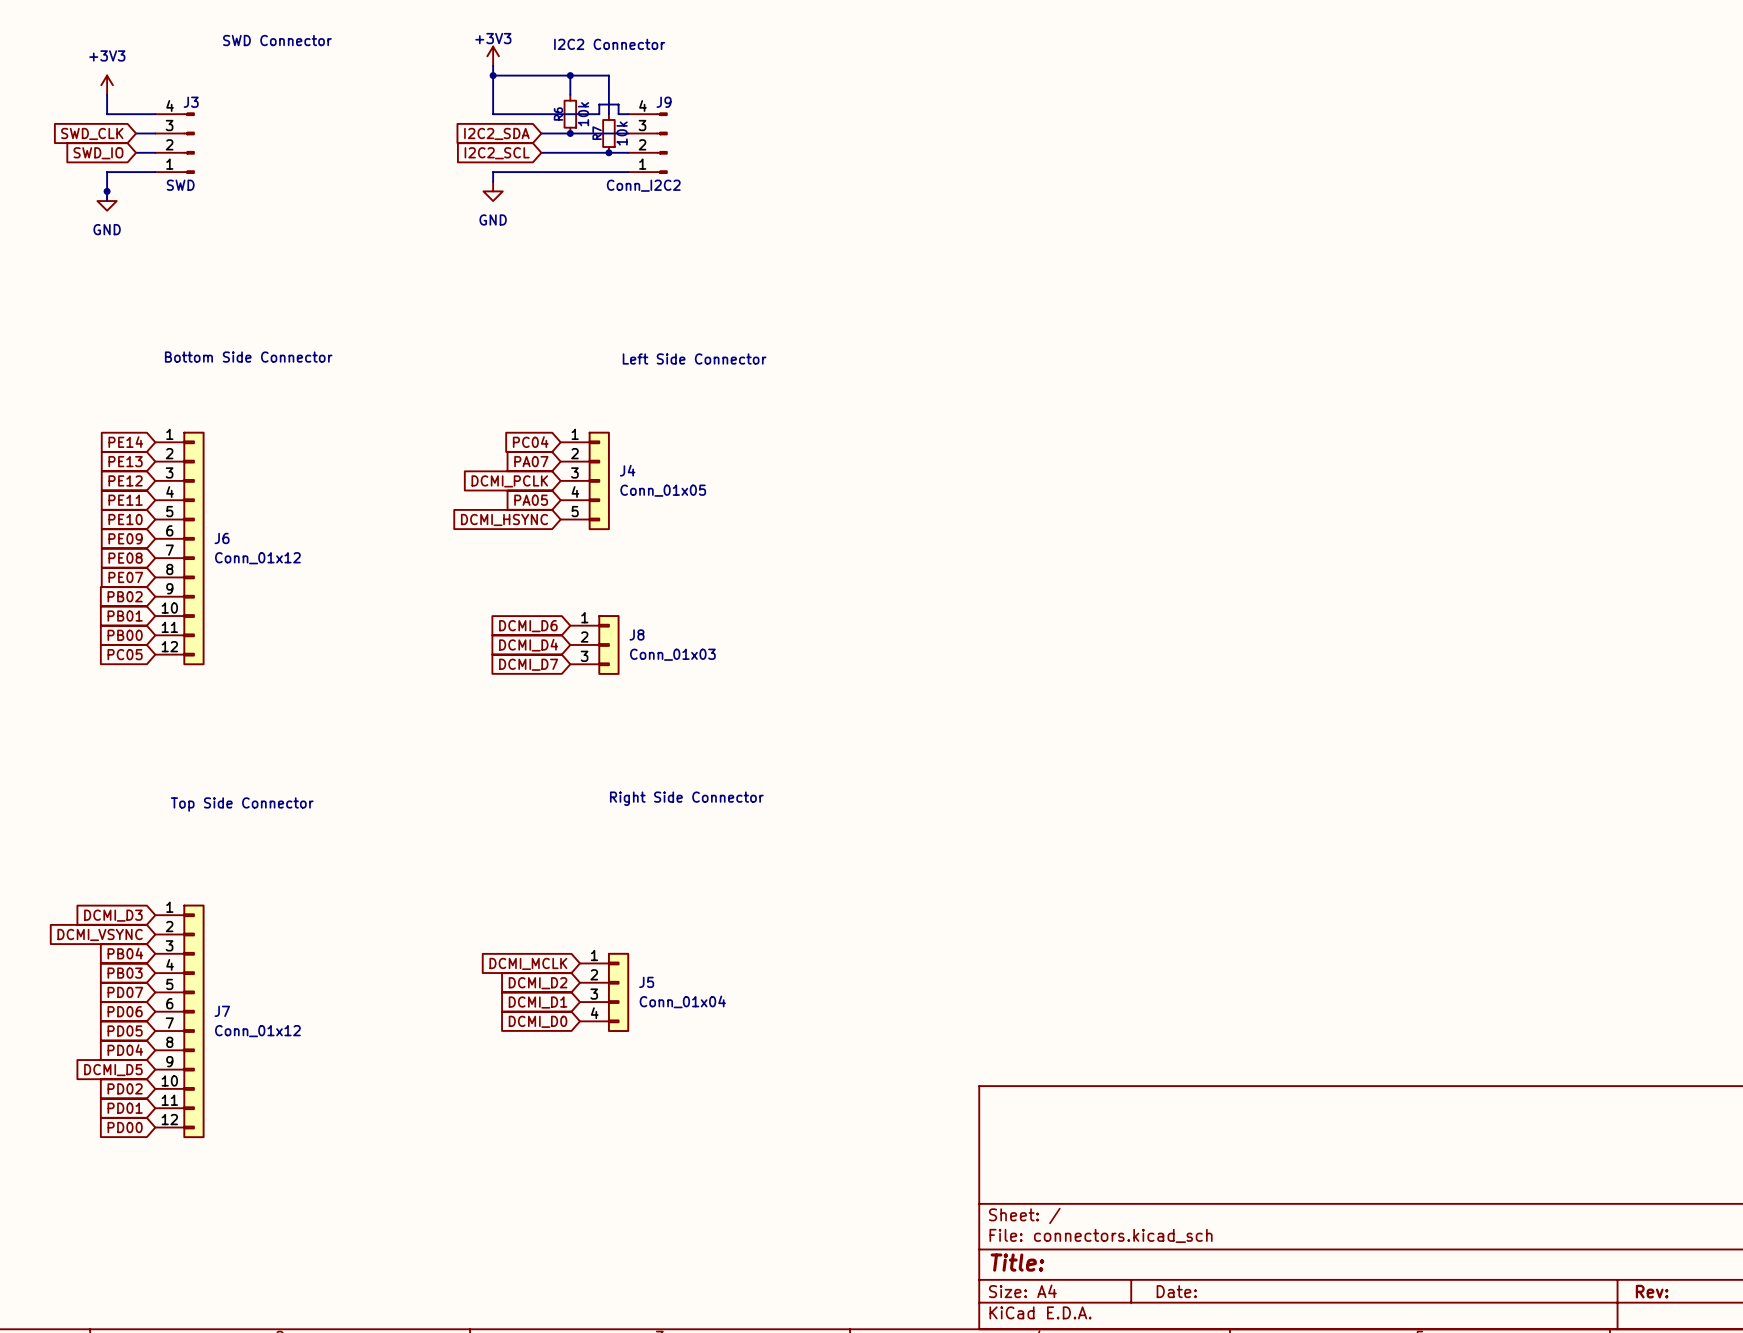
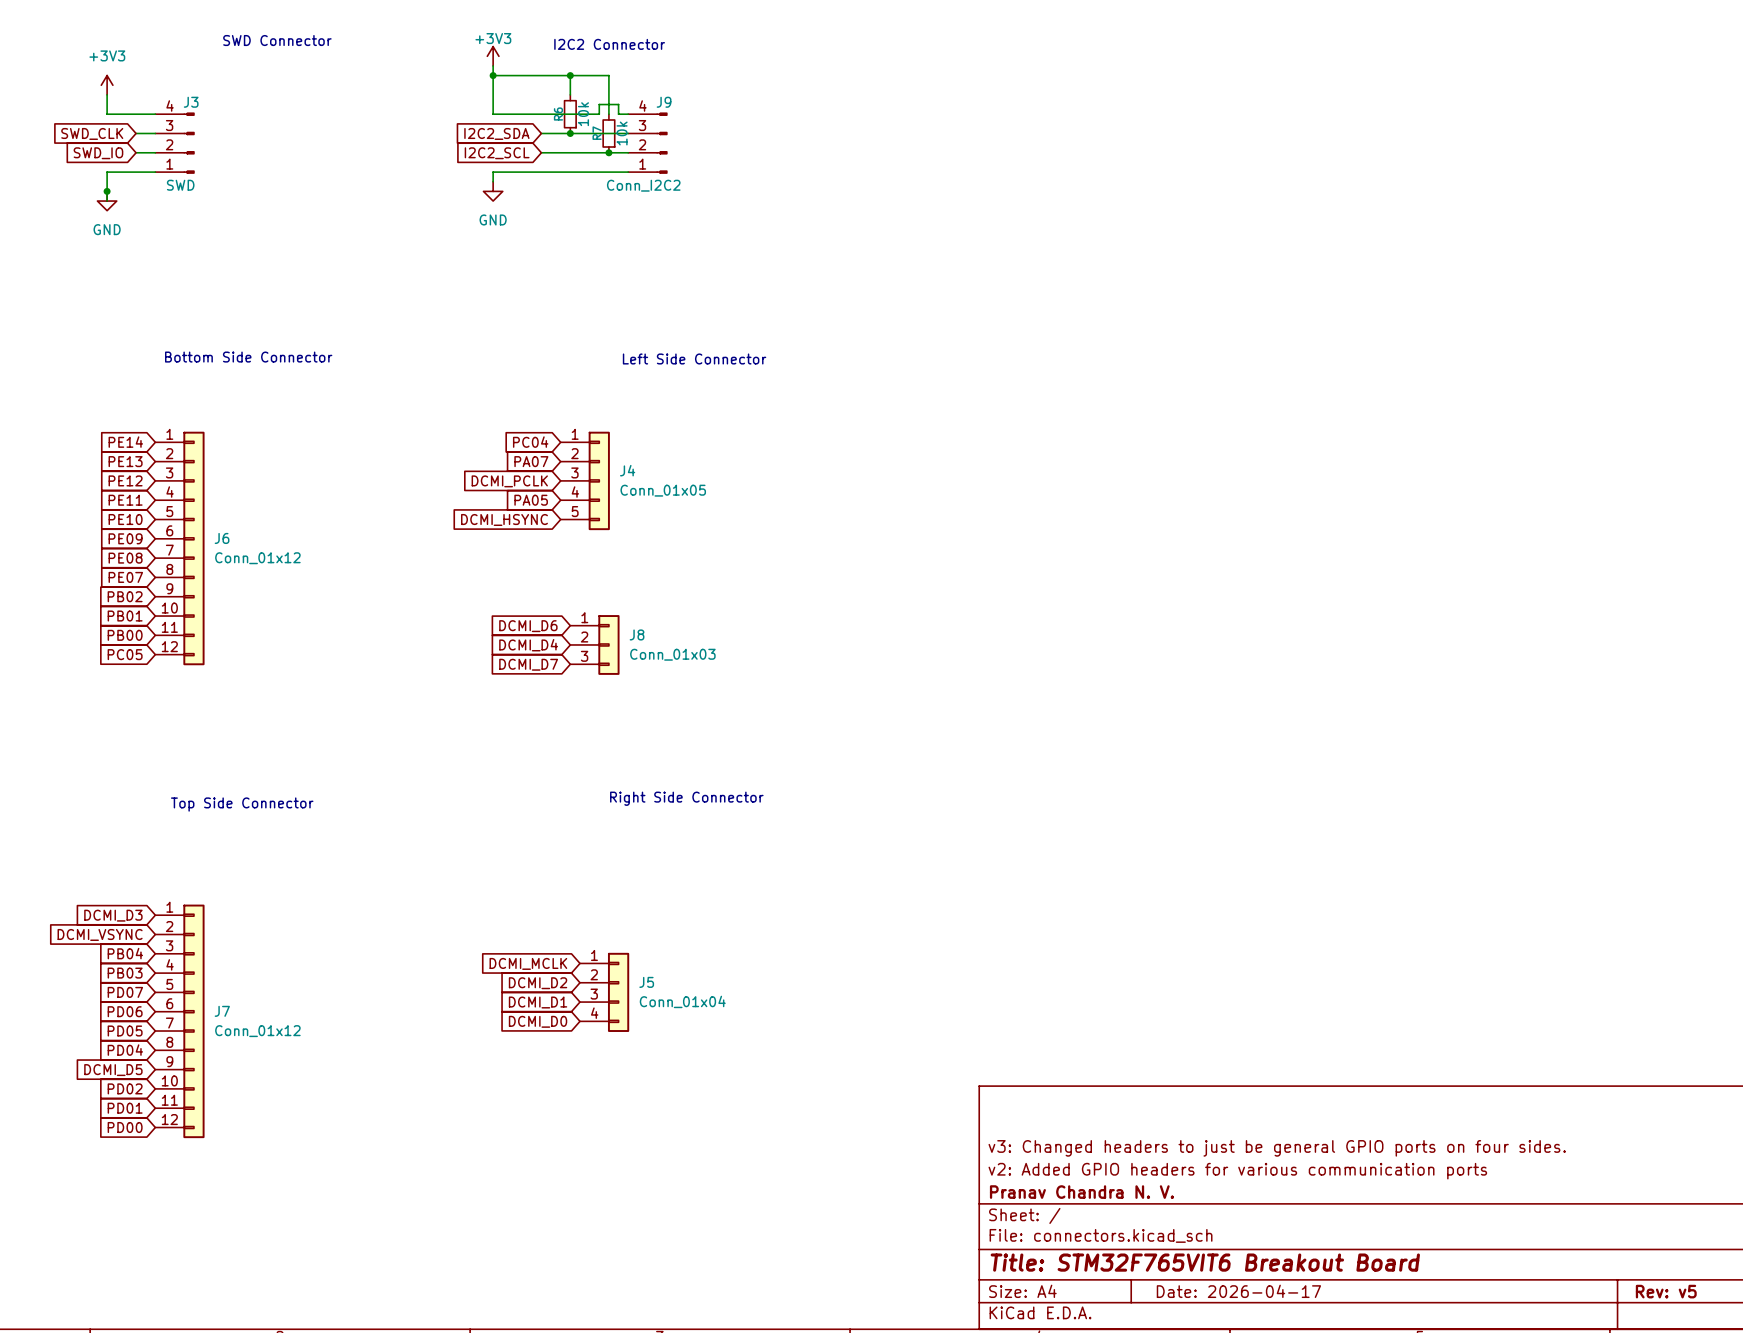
title block: none -> v3: Changed headers to just be general GPIO ports on four sides. (1277, 1148)
title block: none -> v2: Added GPIO headers for various communication ports (1237, 1171)
title block: none -> Pranav Chandra N. V. (1081, 1192)
title block: Title: (1017, 1262) -> Title: STM32F765VIT6 Breakout Board (1205, 1262)
title block: Date: (1176, 1291) -> Date: 2026-04-17 (1238, 1291)
title block: Rev: (1652, 1291) -> Rev: v5 (1666, 1291)

